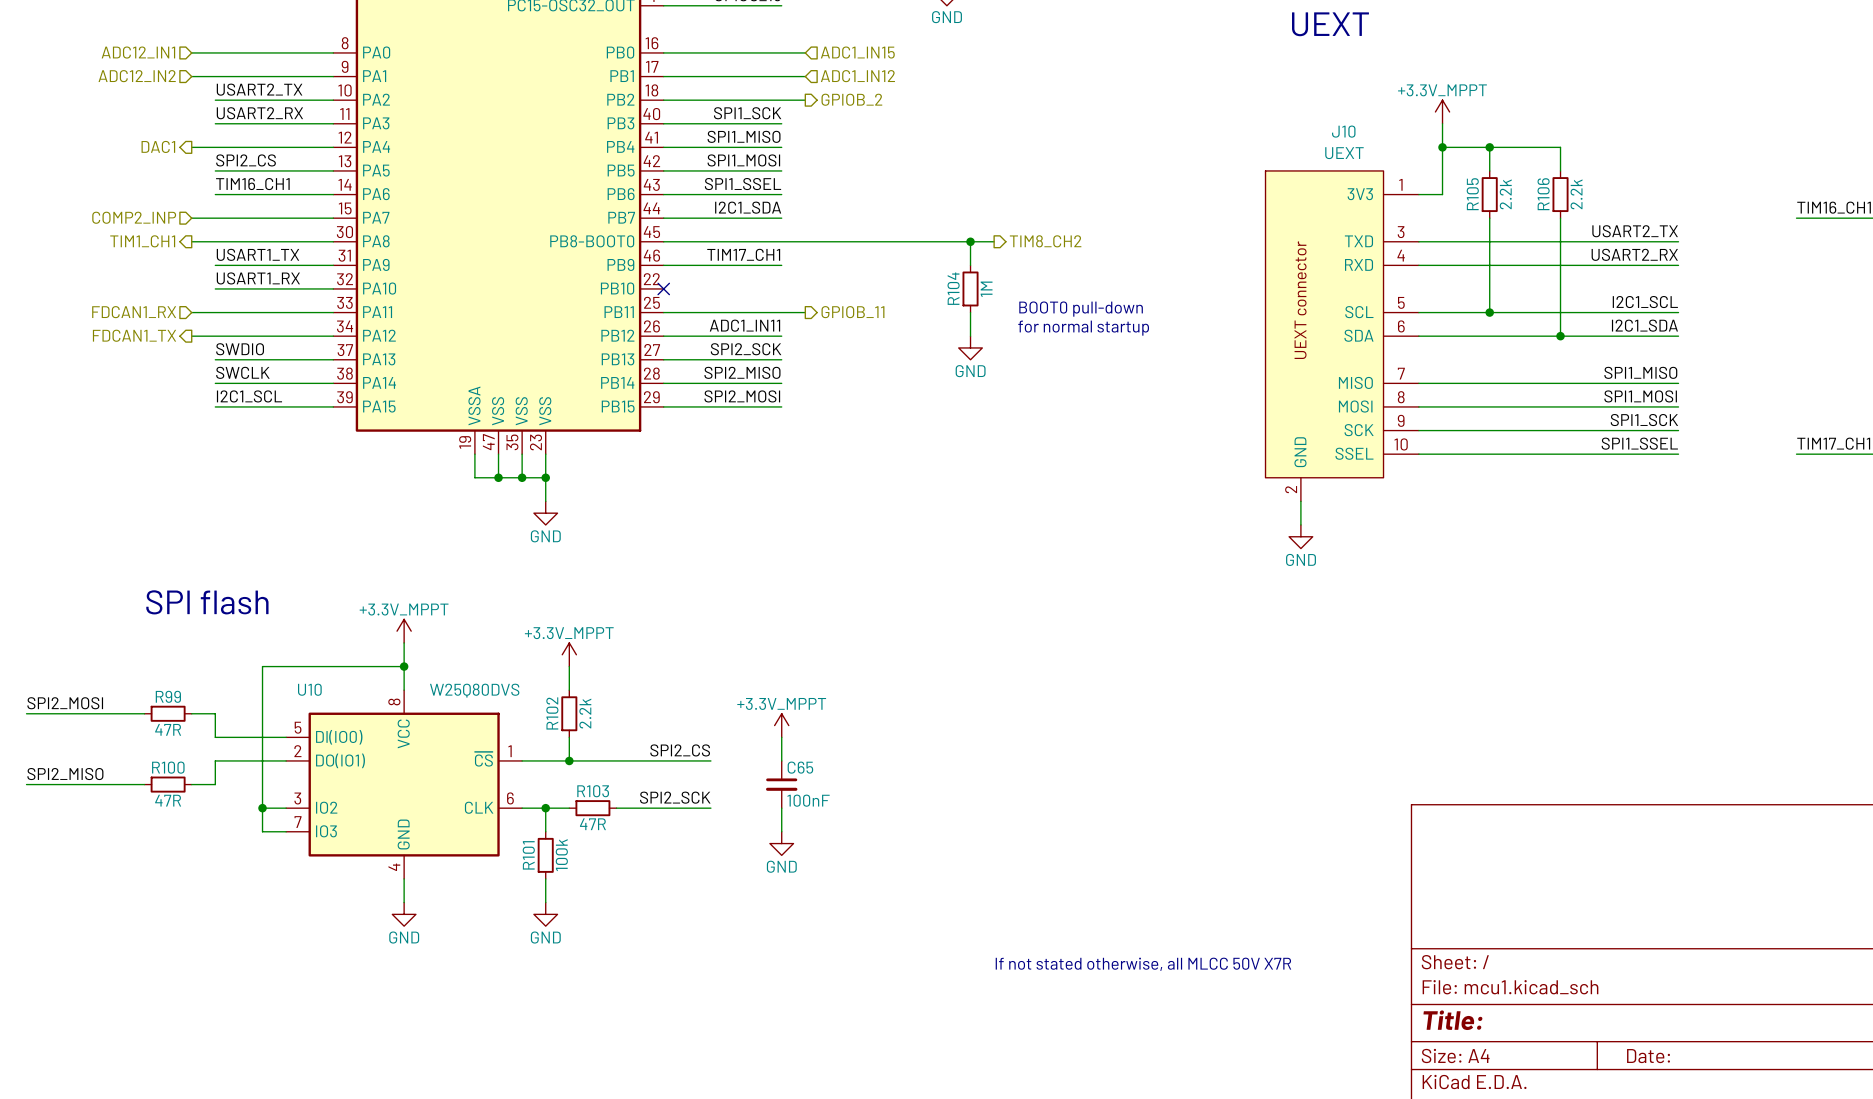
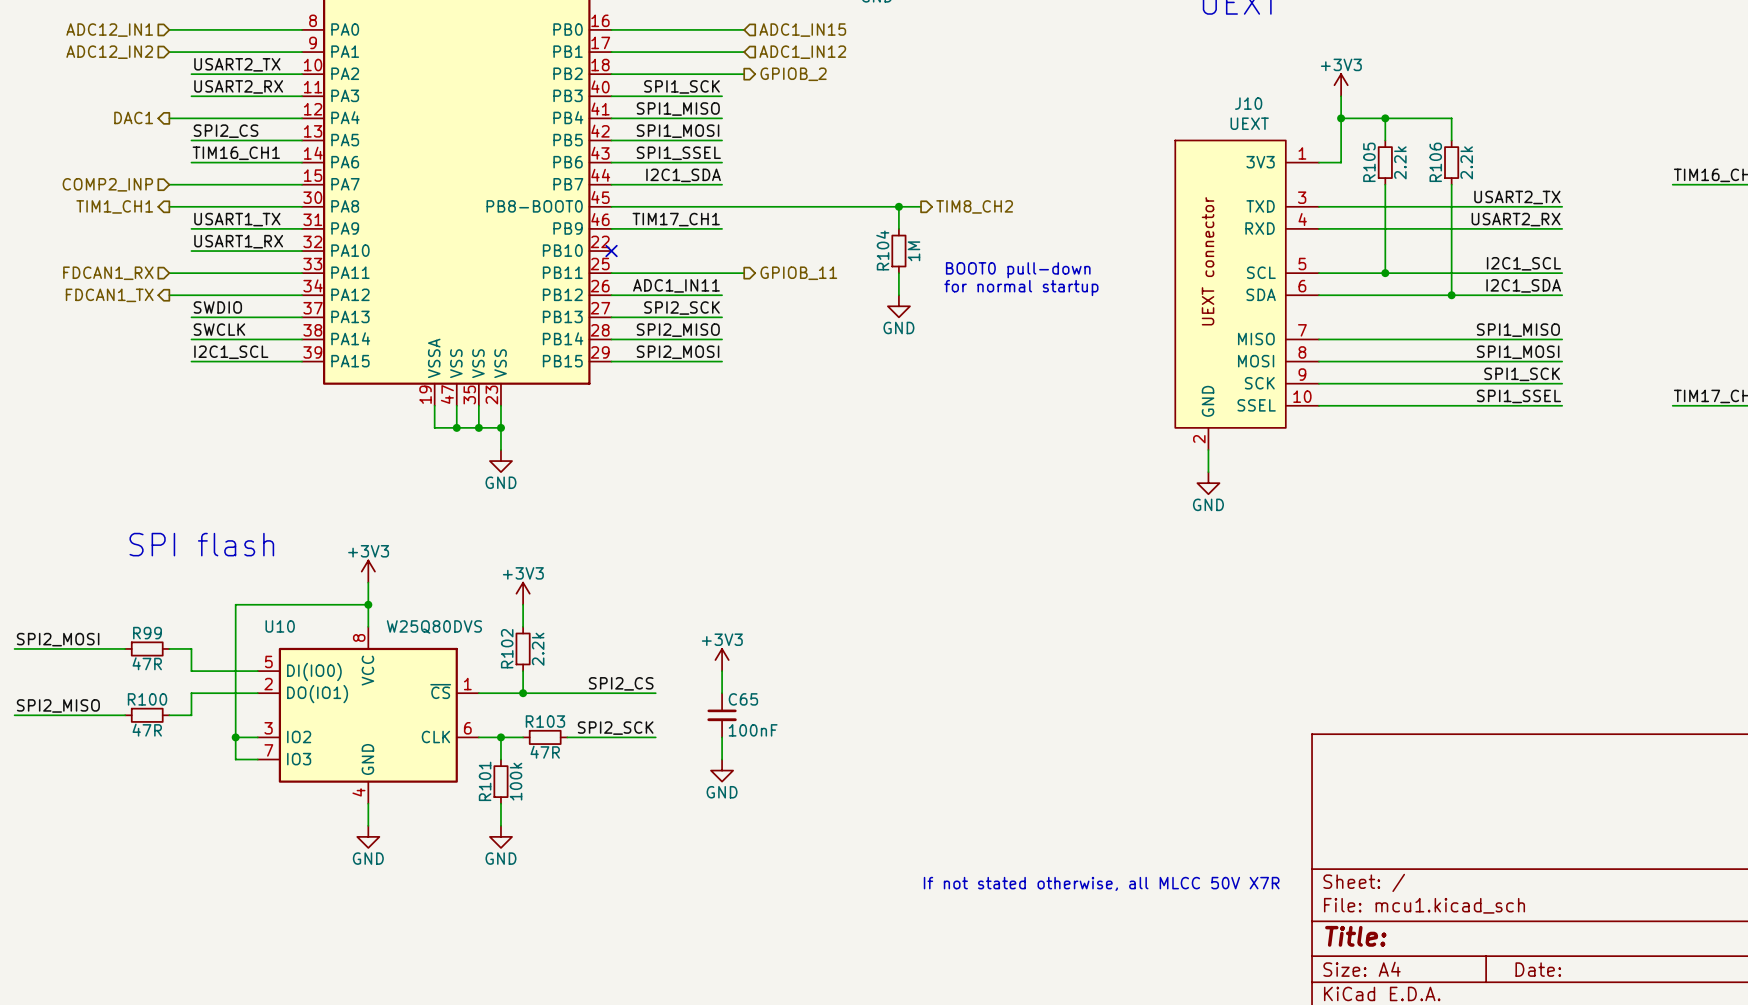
power symbol: +3.3V_MPPT (1442, 111) -> +3V3 (1341, 85)
power symbol: +3.3V_MPPT (404, 631) -> +3V3 (368, 571)
power symbol: +3.3V_MPPT (569, 654) -> +3V3 (523, 593)
power symbol: +3.3V_MPPT (781, 725) -> +3V3 (722, 660)

